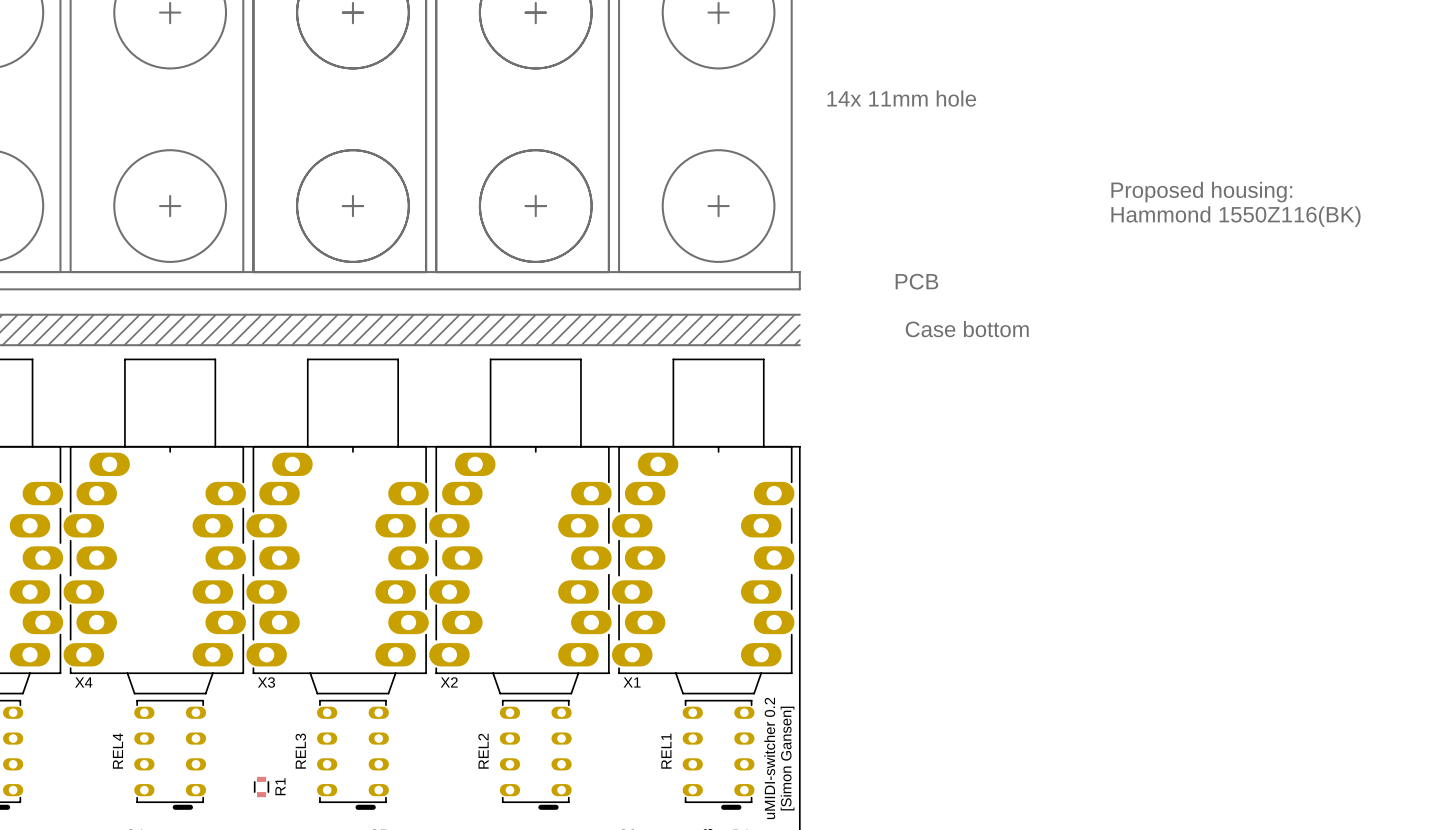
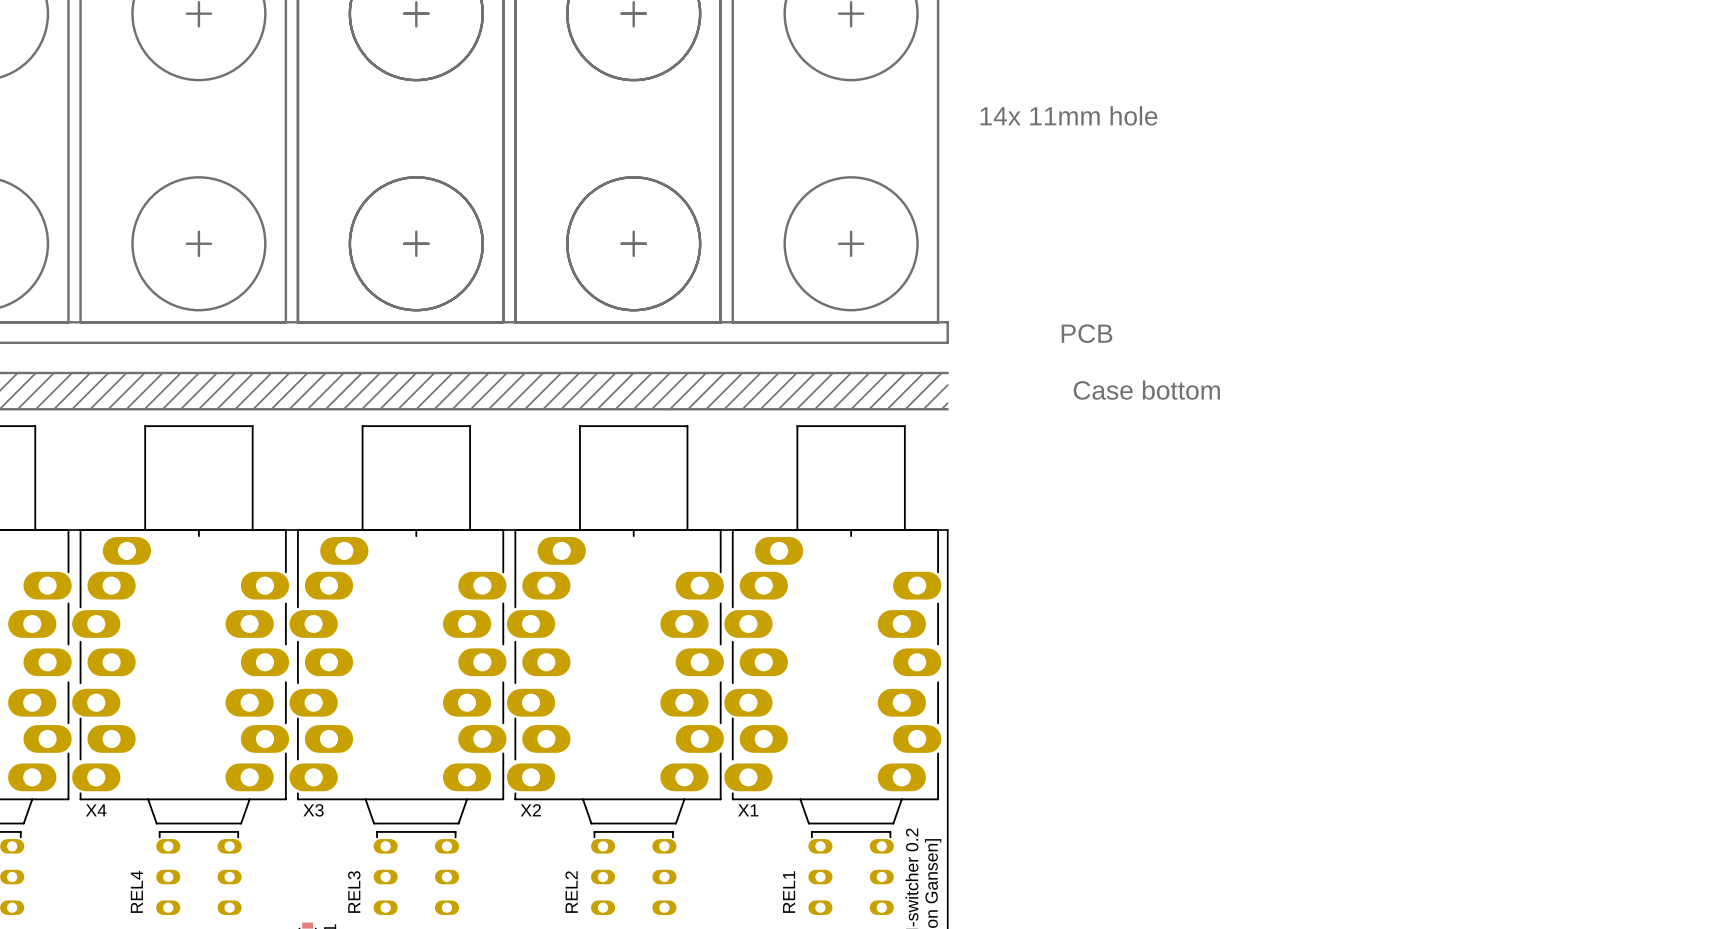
text: Proposed housing: (1201, 192) -> none
text: Hammond 1550Z116(BK) (1235, 216) -> none

